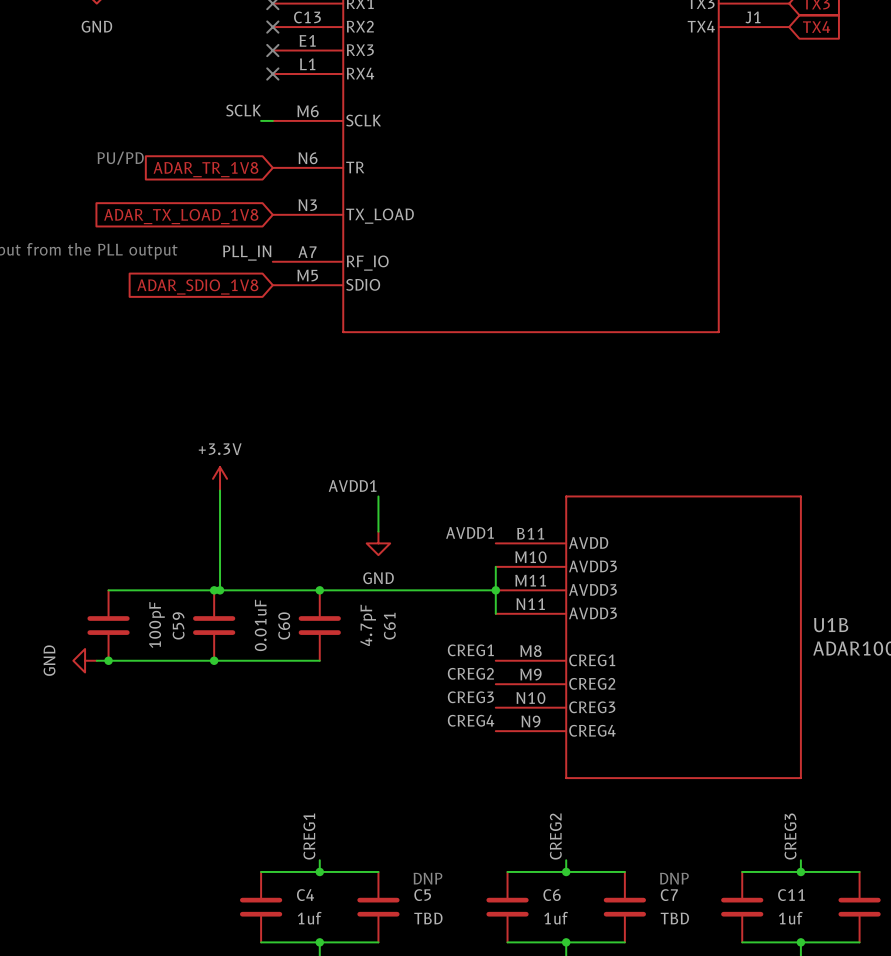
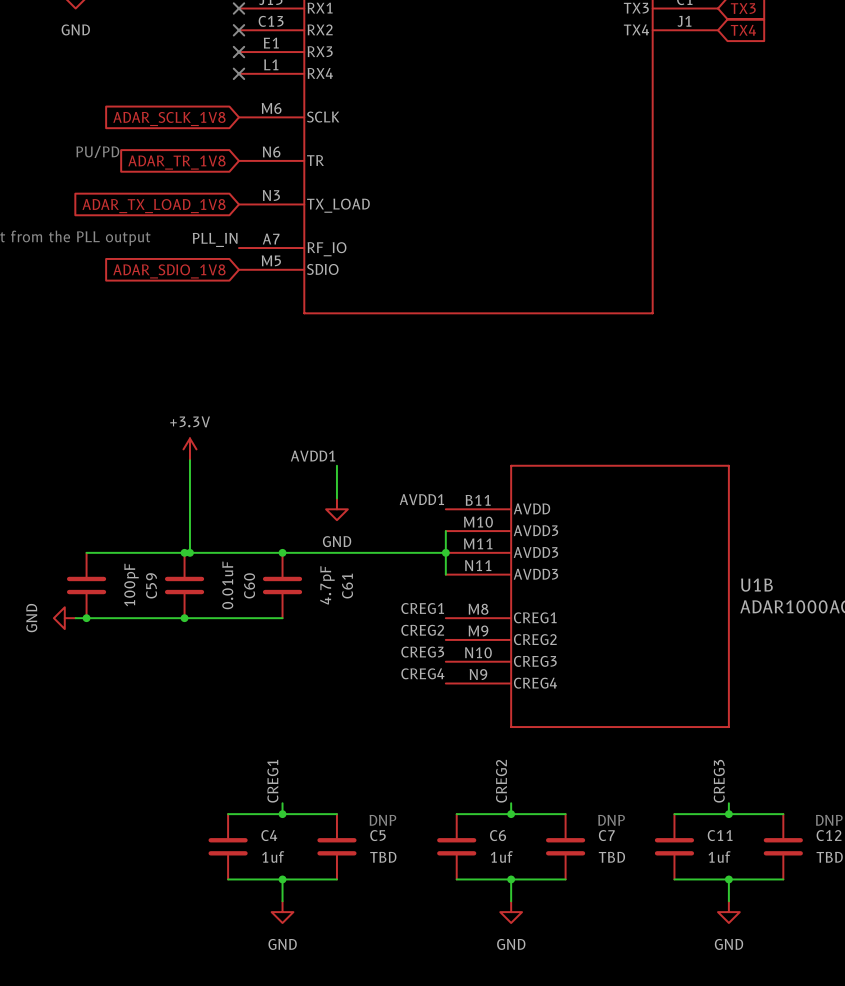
label: SCLK (243, 110) -> none
wire: (261, 120) (272, 120) -> none
global label: none -> ADAR_SCLK_1V8 (169, 119)

